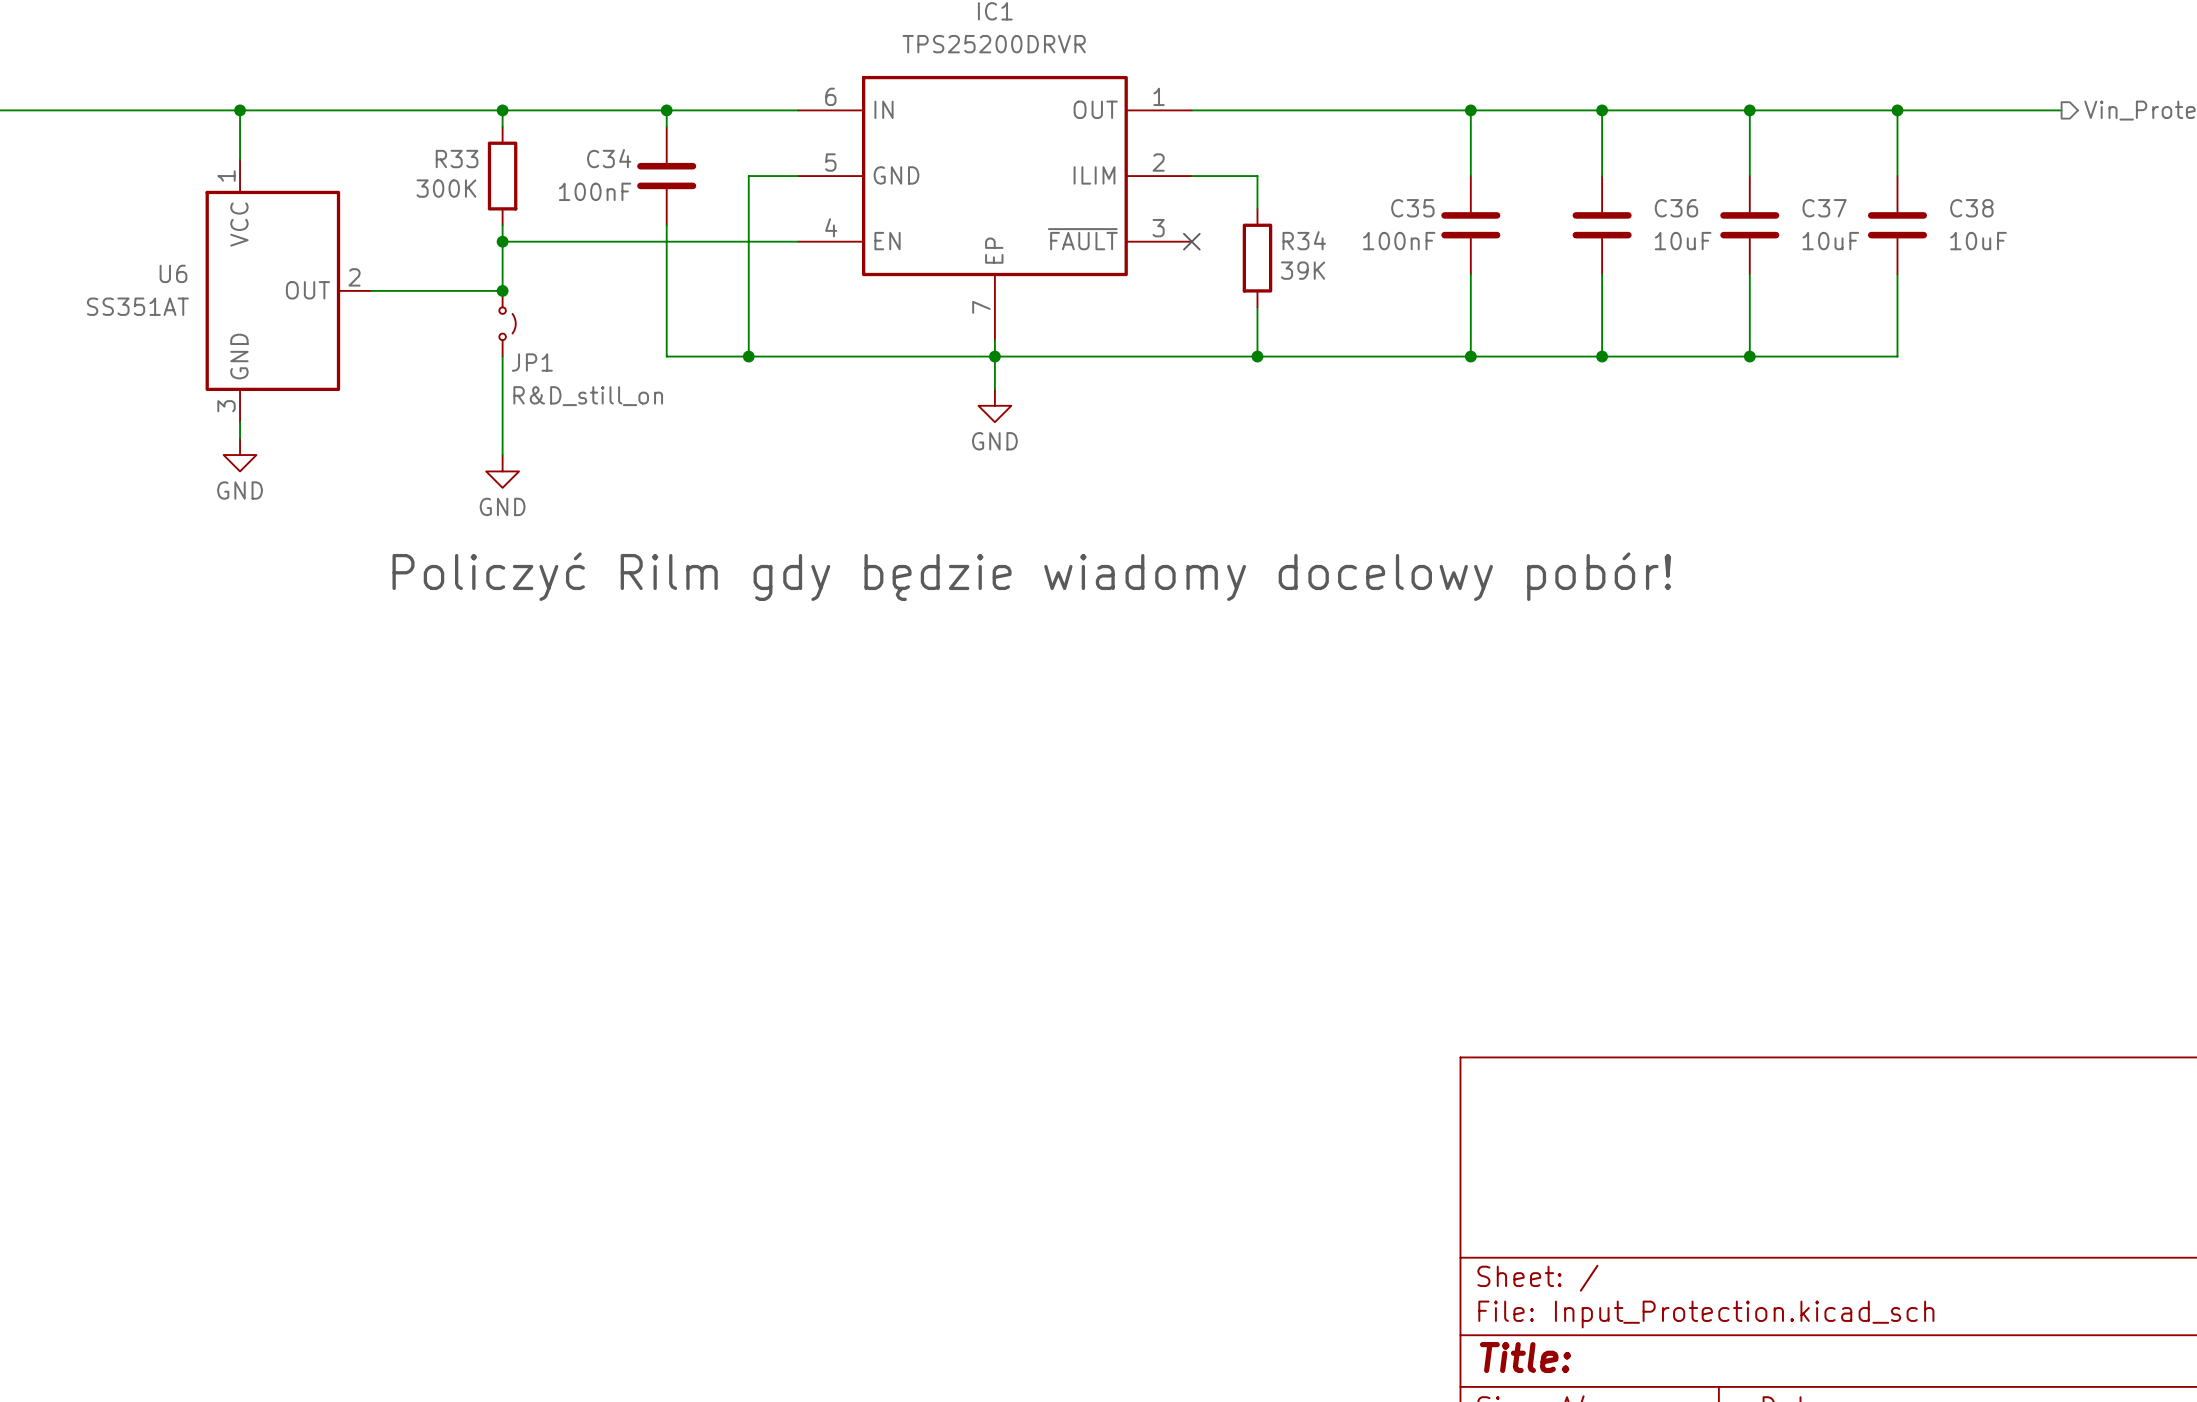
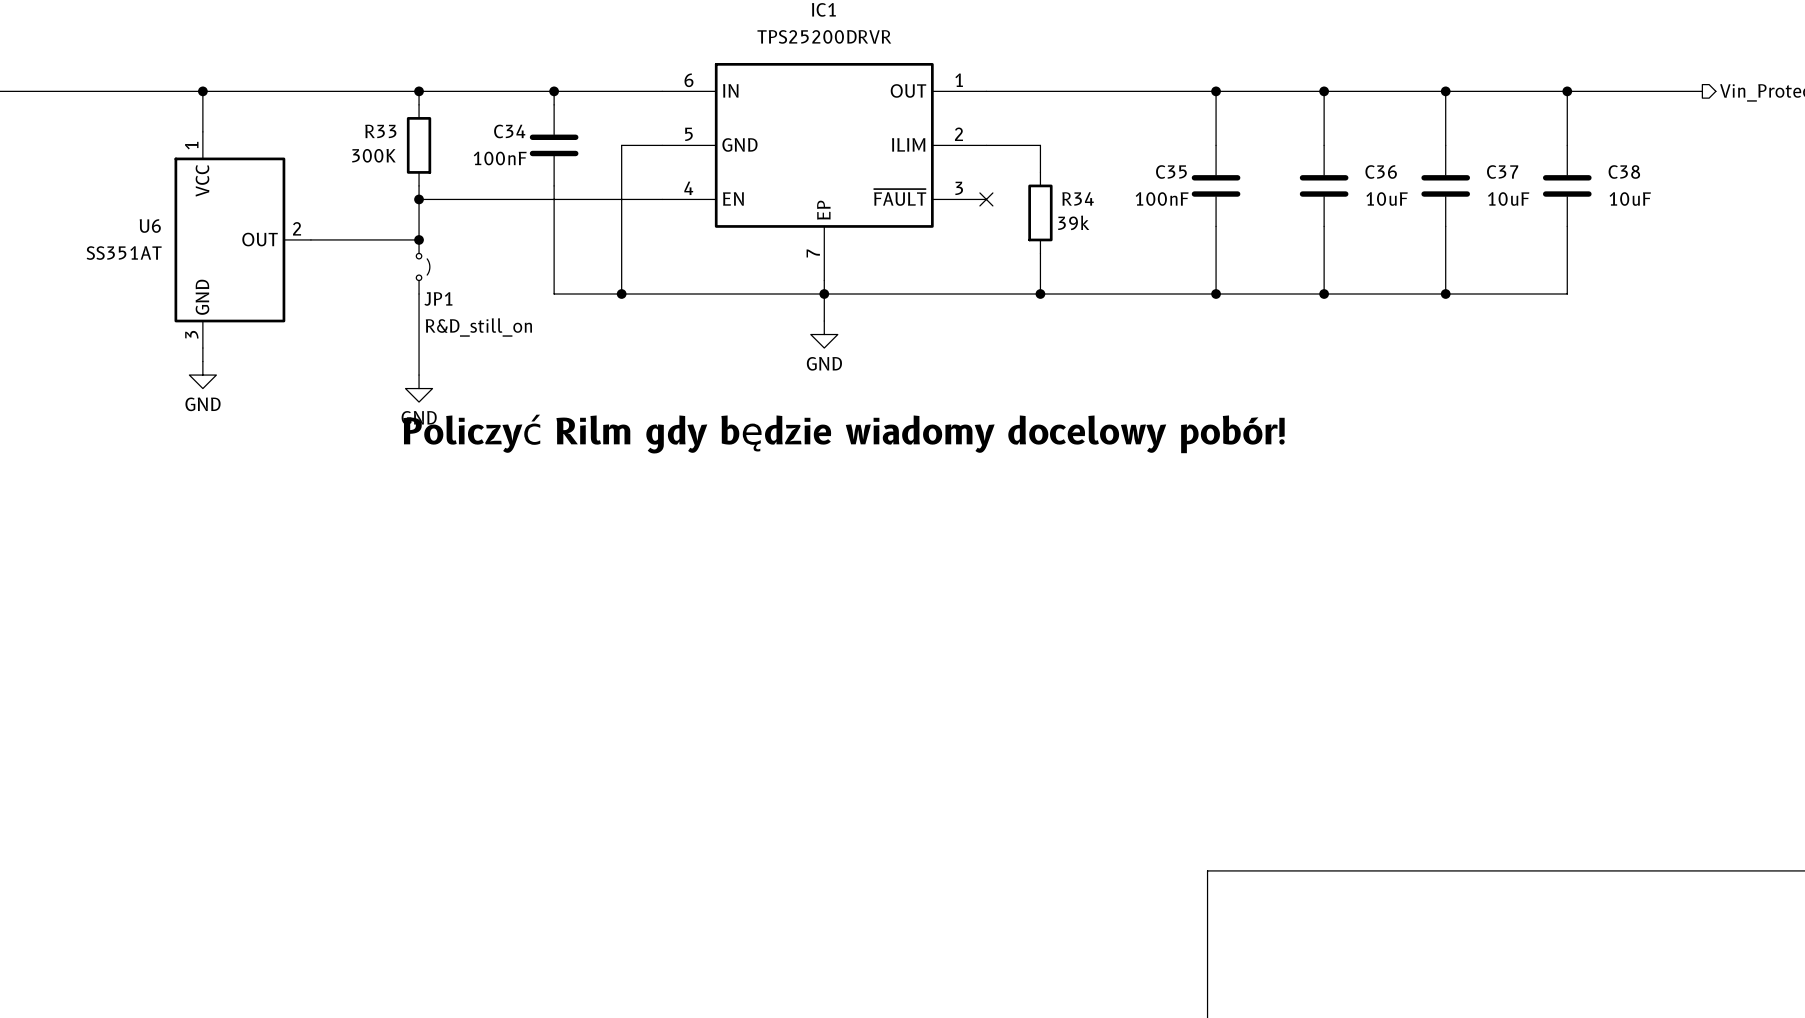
R34 value: 39K (1303, 270) -> 39k (1073, 222)
text position: Policzyć Rilm gdy będzie wiadomy docelowy pobór! (1031, 576) -> Policzyć Rilm gdy będzie wiadomy docelowy pobór! (843, 434)

